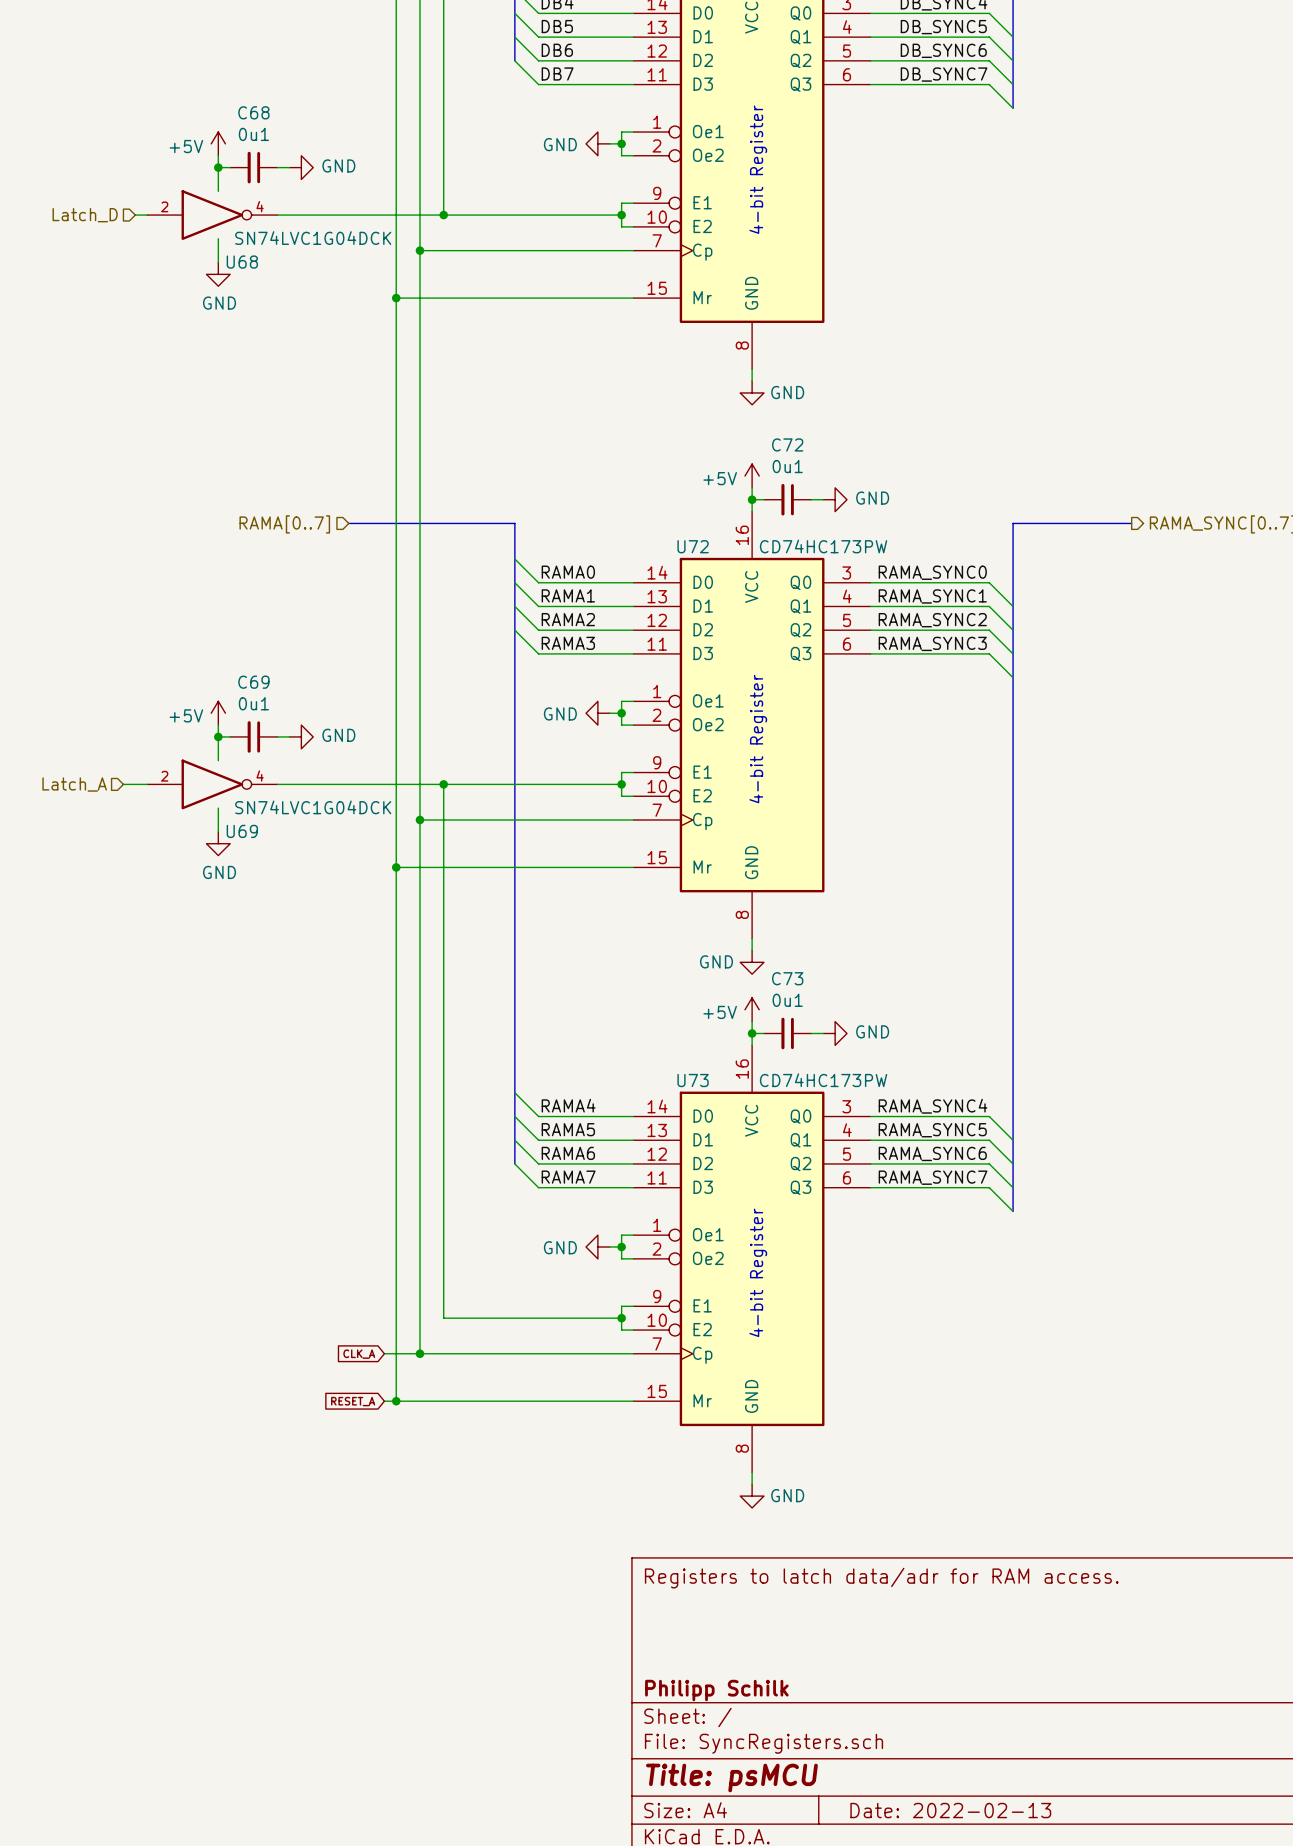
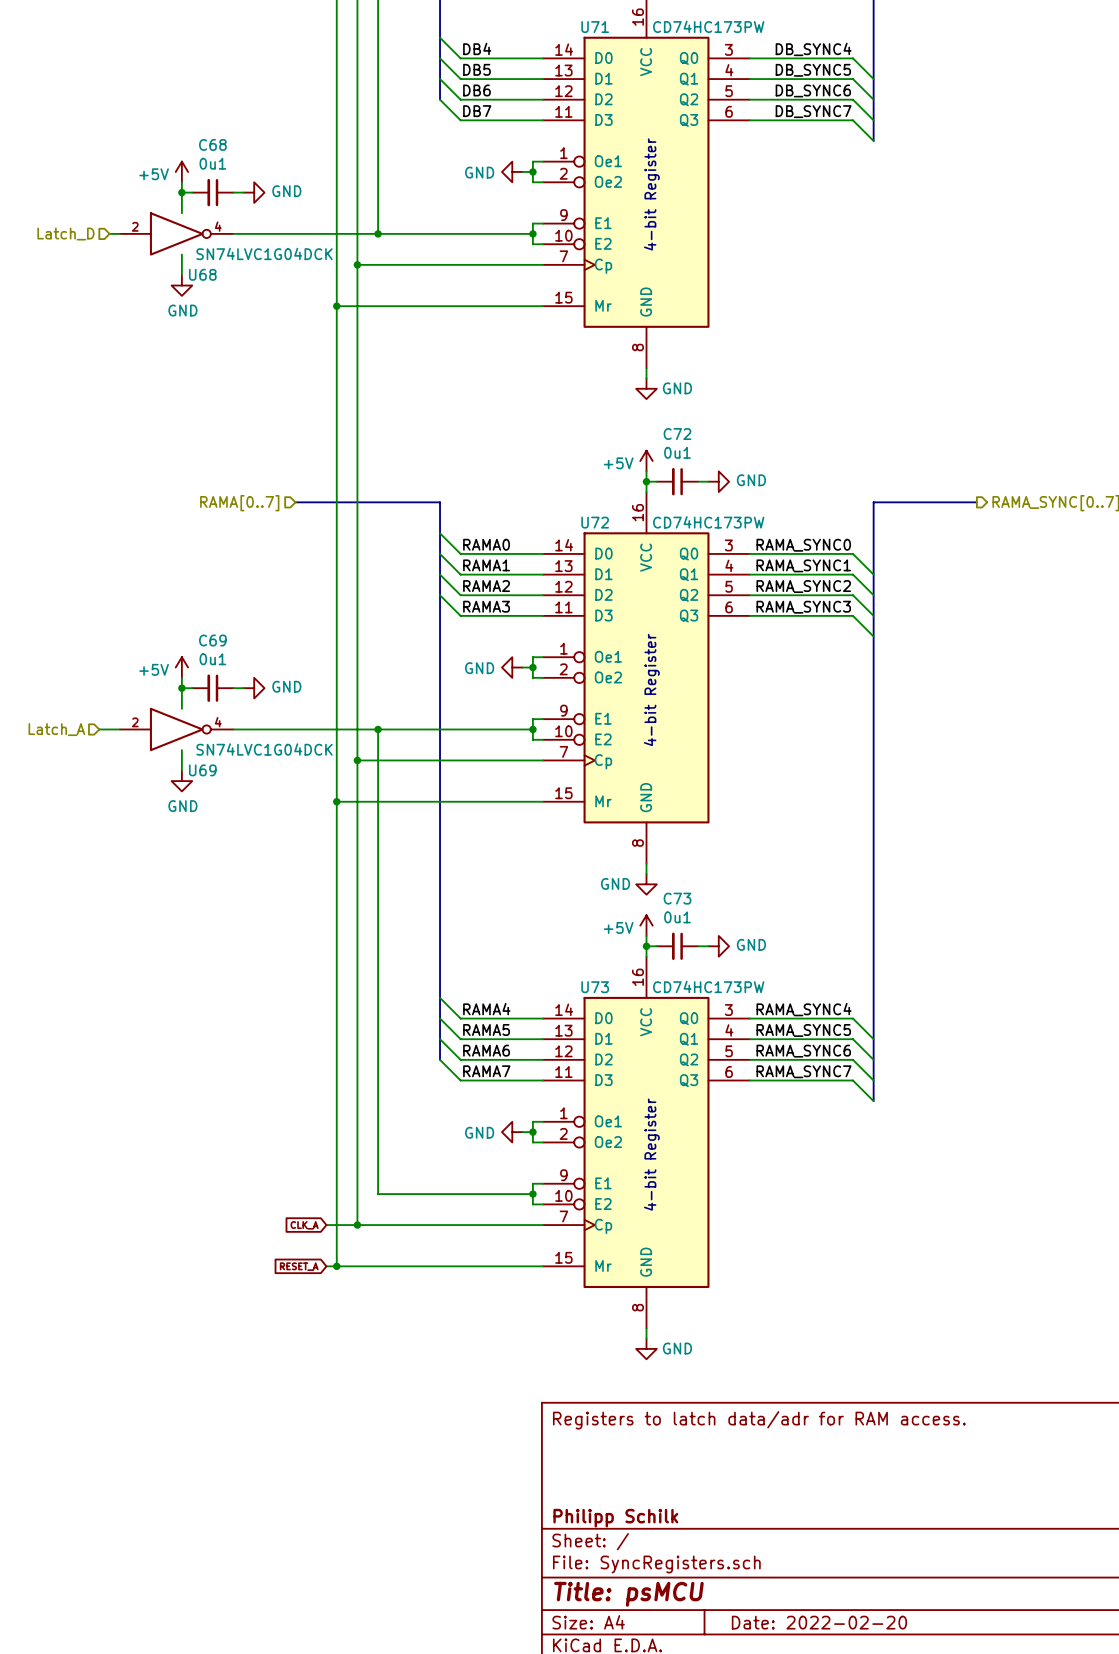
title block: Date: 2022-02-13 (950, 1810) -> Date: 2022-02-20 (819, 1622)

